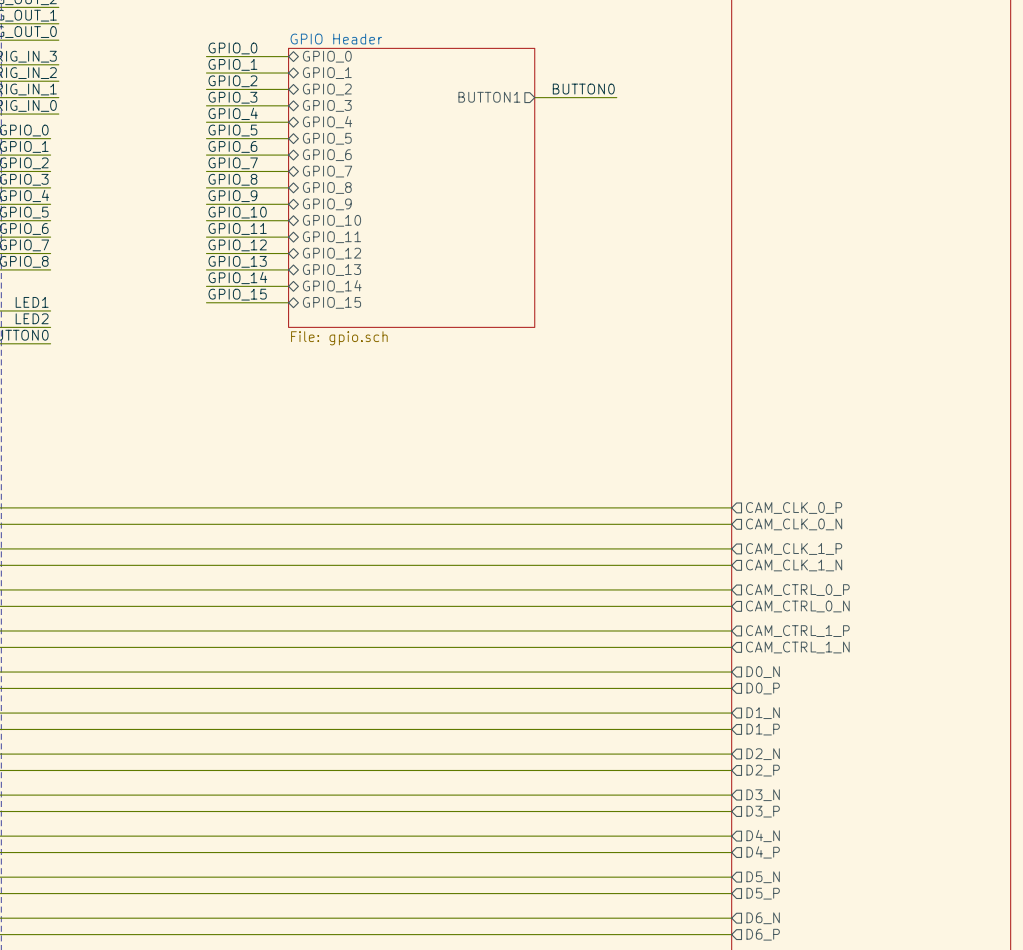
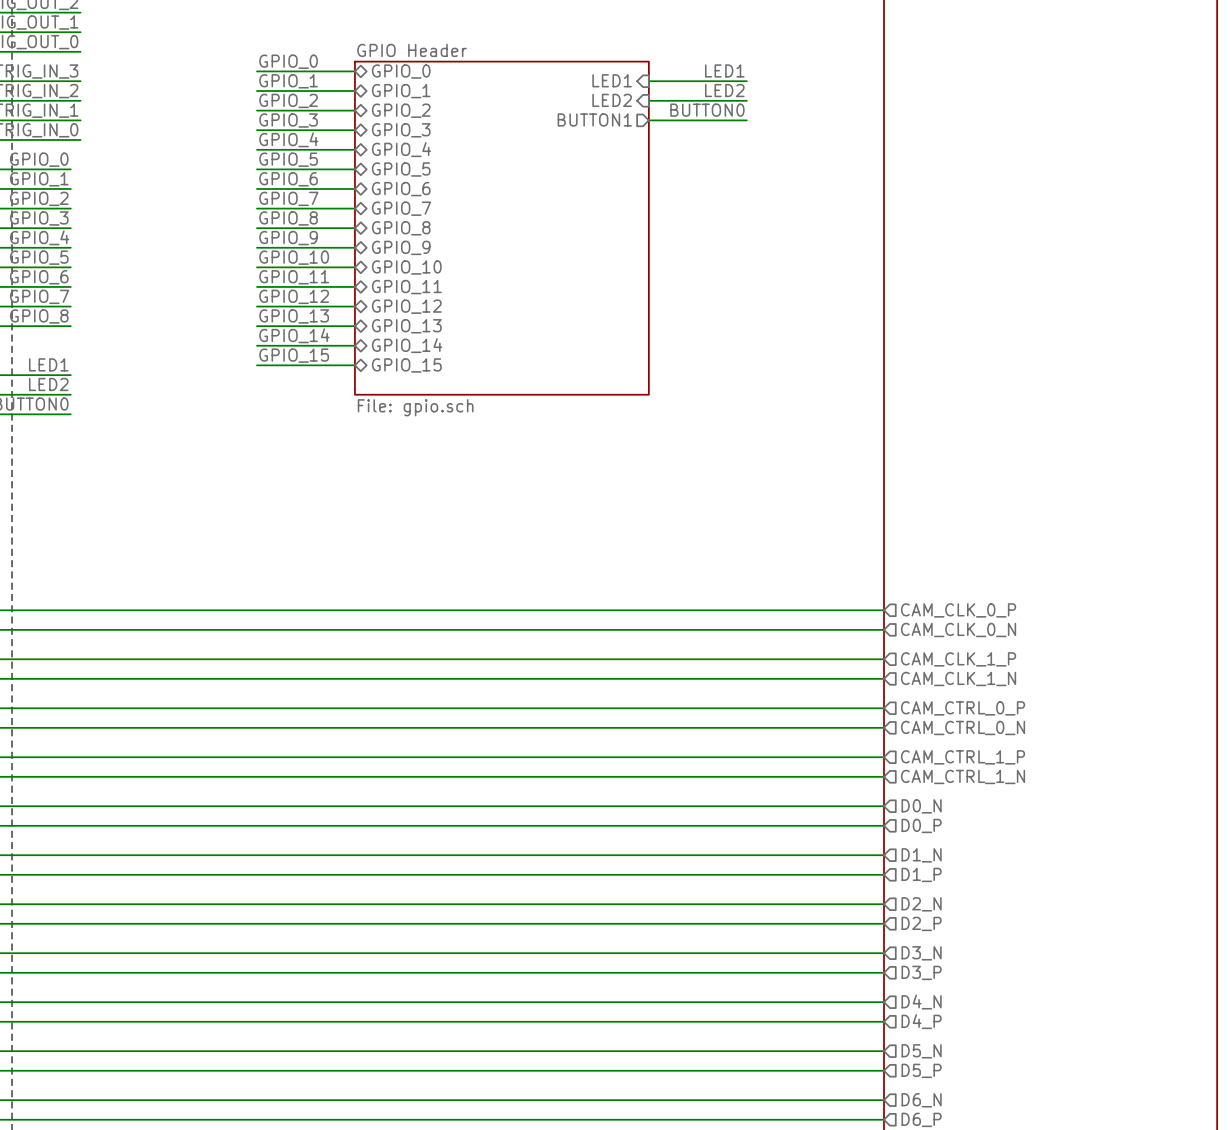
label: none -> LED1 (724, 70)
sheet pin: none -> LED1 (612, 80)
wire: none -> (648, 81) (746, 81)
label: none -> LED2 (724, 90)
sheet pin: none -> LED2 (612, 100)
wire: none -> (648, 100) (746, 100)

